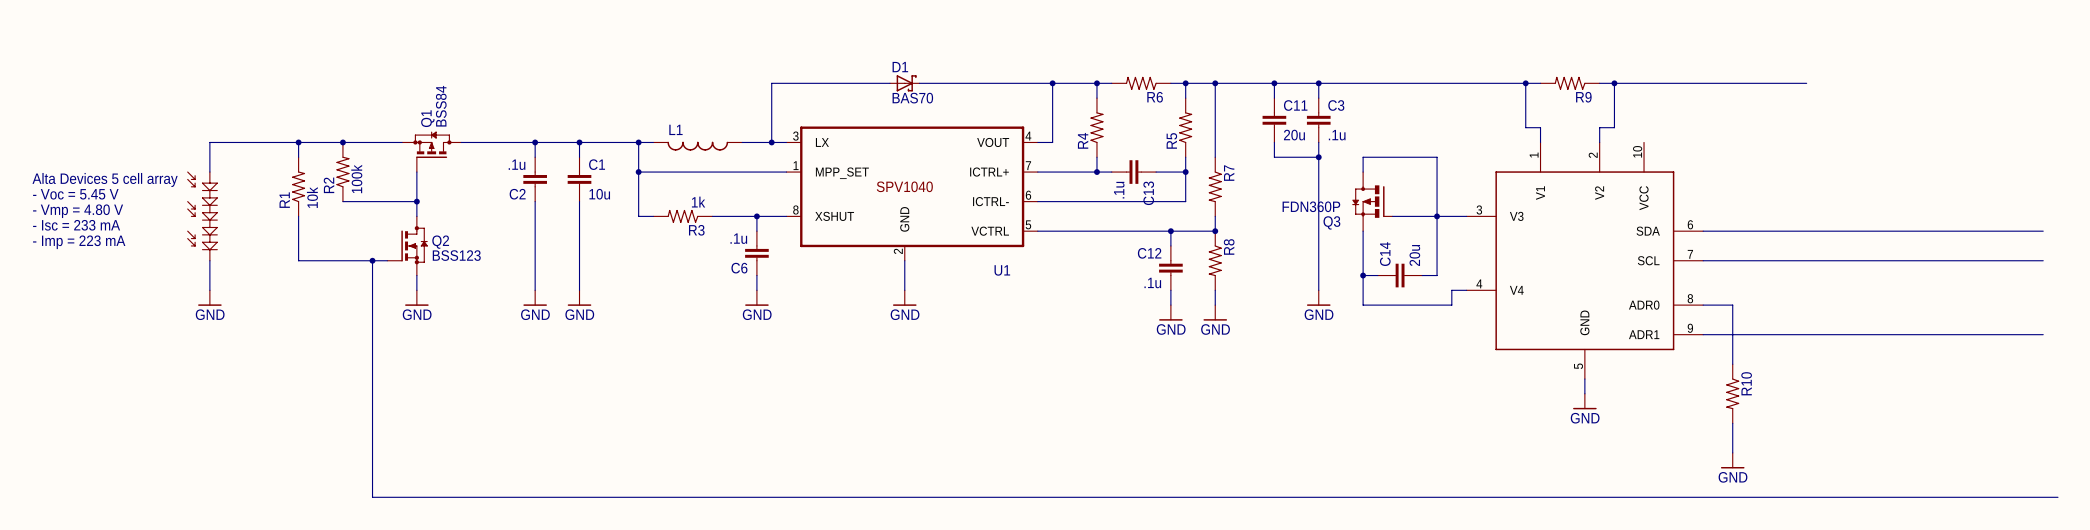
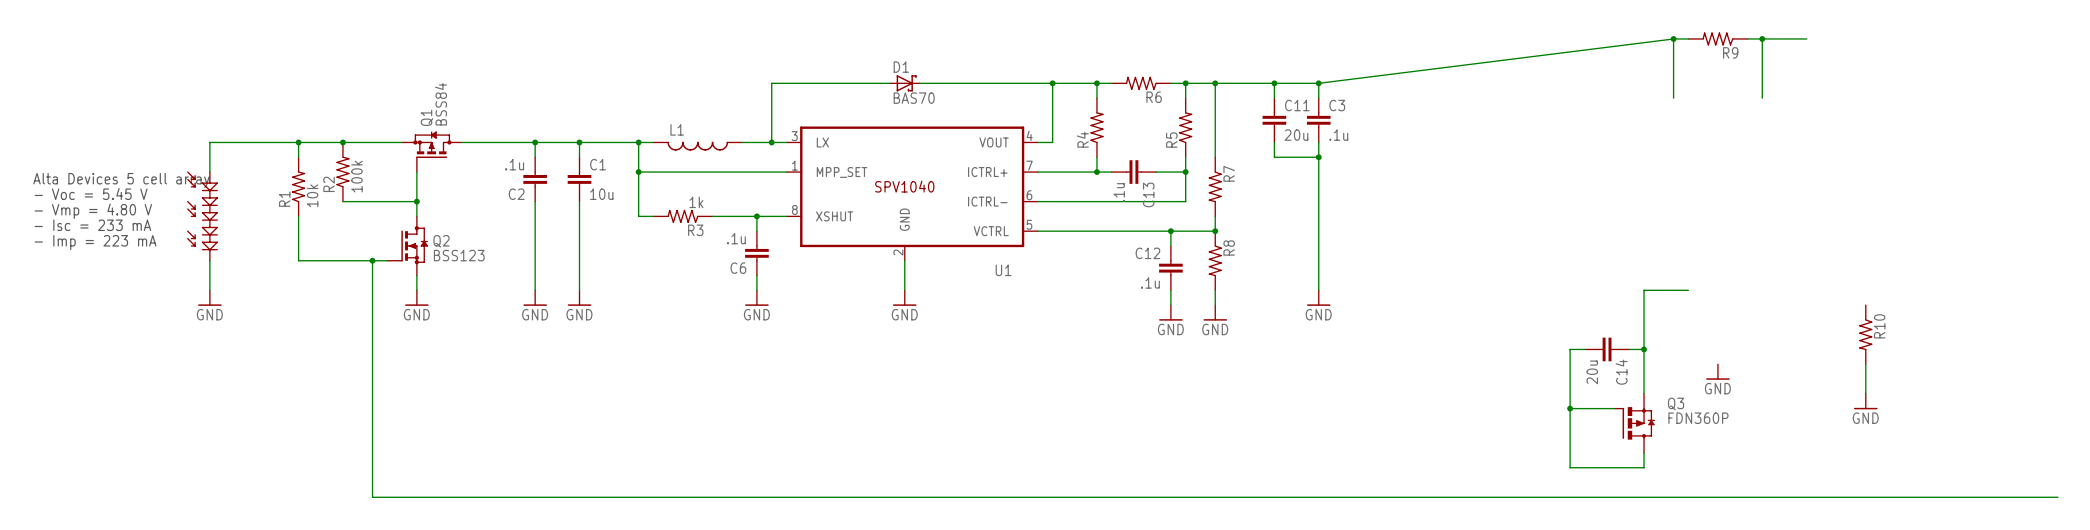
wire: none -> (1673, 38) (1688, 38)
wire: none -> (1673, 38) (1673, 98)
junction: none -> (1673, 38)
wire: none -> (1747, 38) (1806, 38)
wire: none -> (1762, 38) (1762, 98)
junction: none -> (1762, 38)
wire: (1318, 83) (1540, 83) -> (1318, 83) (1673, 38)
wire: (1525, 83) (1525, 127) (1540, 127) (1540, 142) -> none
junction: (1525, 83) -> none
R9 position: (1570, 83) -> (1717, 38)
wire: (1599, 83) (1806, 83) -> none
wire: (1614, 83) (1614, 127) (1599, 127) (1599, 142) -> none
junction: (1614, 83) -> none
wire: (1363, 172) (1363, 157) (1437, 157) (1437, 275) (1422, 275) -> none
Q3 rotation: 0° (1372, 201) -> 180° (1634, 423)
Q3 position: (1372, 201) -> (1634, 423)
wire: (1392, 216) (1466, 216) -> none
junction: (1437, 216) -> none
wire: (1363, 231) (1363, 305) (1451, 305) (1451, 290) (1466, 290) -> none
wire: (1703, 231) (2043, 231) -> none
C14 name position: C14 (1385, 254) -> C14 (1621, 372)
C14 value position: 20u (1414, 255) -> 20u (1592, 372)
part: (1584, 260) -> none
wire: (1703, 260) (2043, 260) -> none
wire: (1363, 275) (1377, 275) -> none
junction: (1363, 275) -> none
C14 position: (1400, 275) -> (1607, 349)
wire: none -> (1688, 290) (1644, 290) (1644, 393)
wire: (1703, 305) (1732, 305) (1732, 364) -> none
wire: (1703, 334) (2043, 334) -> none
wire: none -> (1584, 349) (1570, 349) (1570, 467) (1644, 467) (1644, 452)
junction: none -> (1644, 349)
wire: none -> (1865, 364) (1865, 393)
power symbol: none -> GND (1717, 372)
wire: (1584, 379) (1584, 393) -> none
R10 position: (1732, 393) -> (1865, 334)
power symbol: GND (1584, 401) -> none
power symbol: none -> GND (1865, 401)
wire: none -> (1570, 408) (1614, 408)
junction: none -> (1570, 408)
wire: (1732, 423) (1732, 452) -> none
power symbol: GND (1732, 460) -> none

